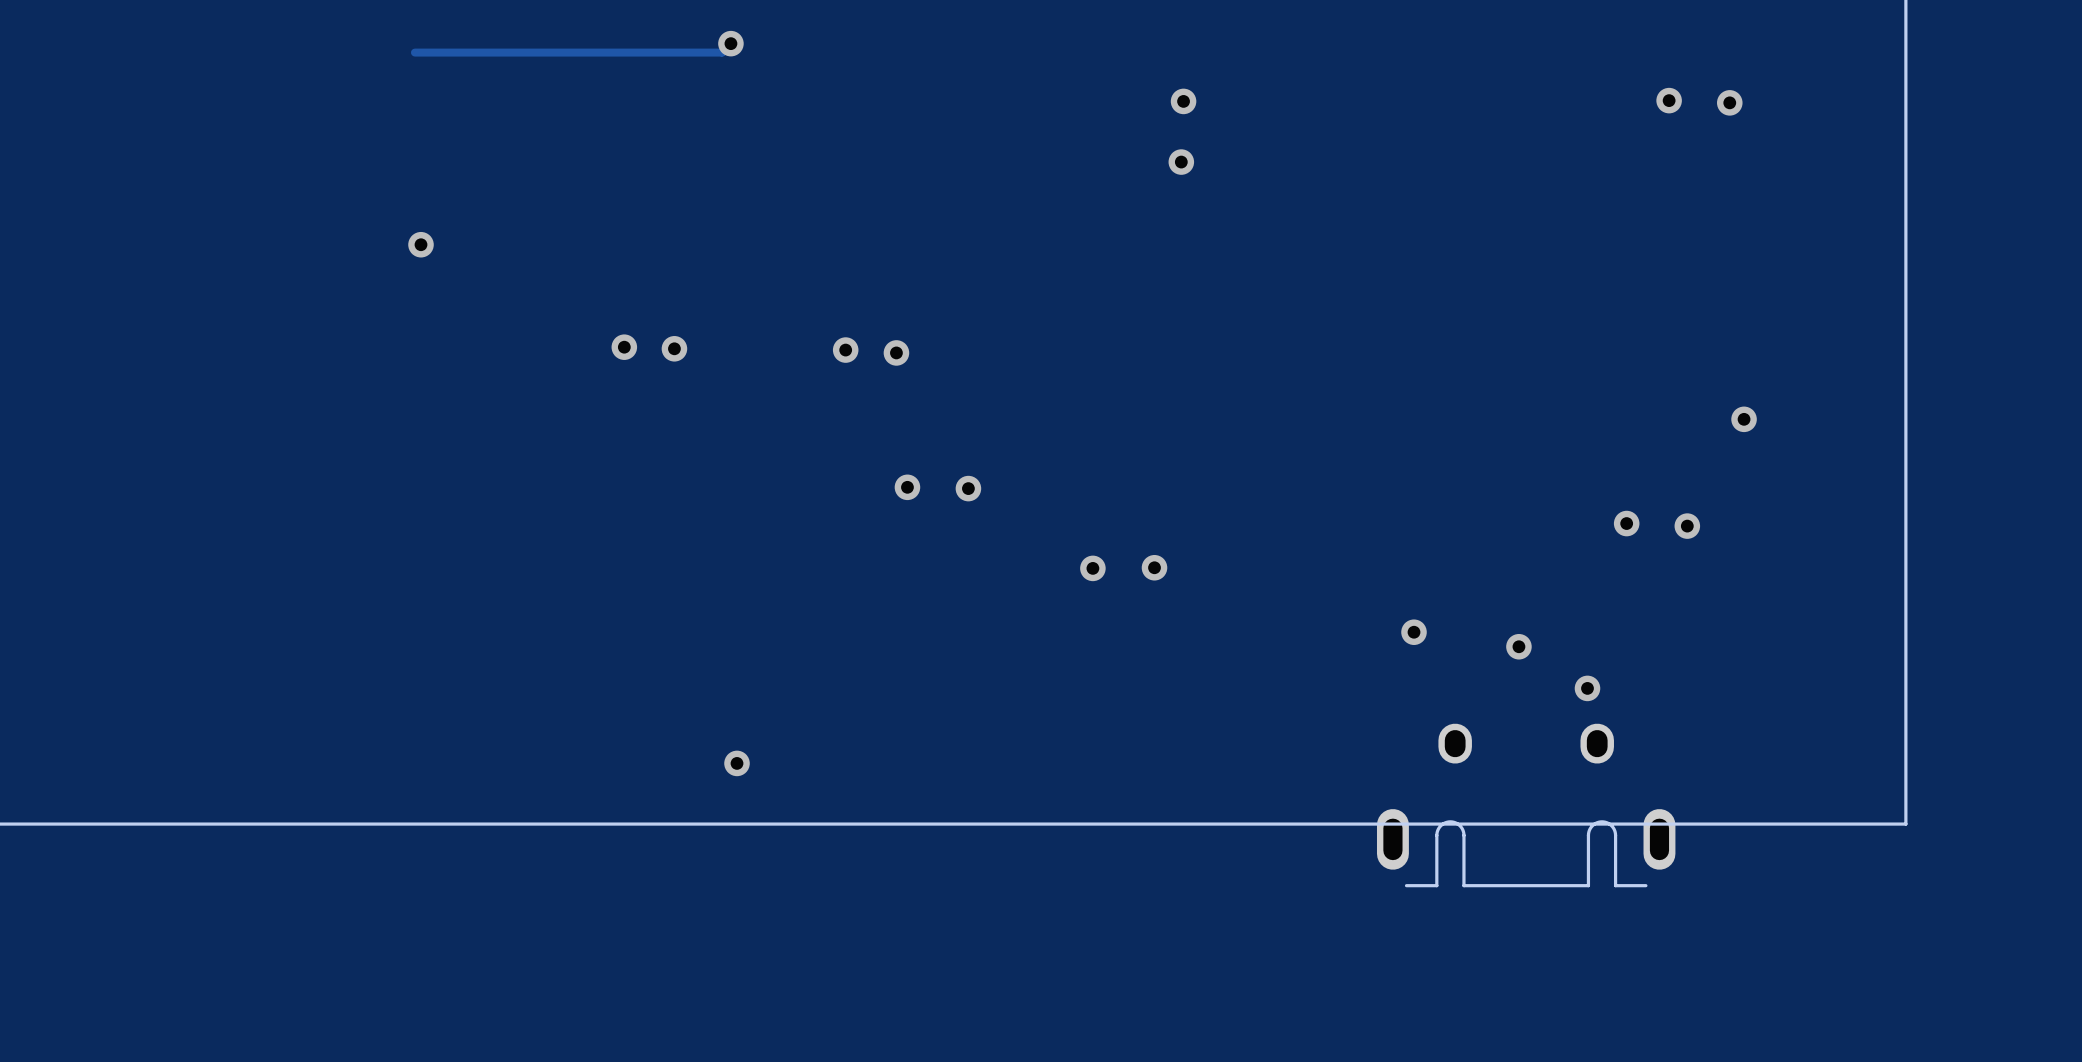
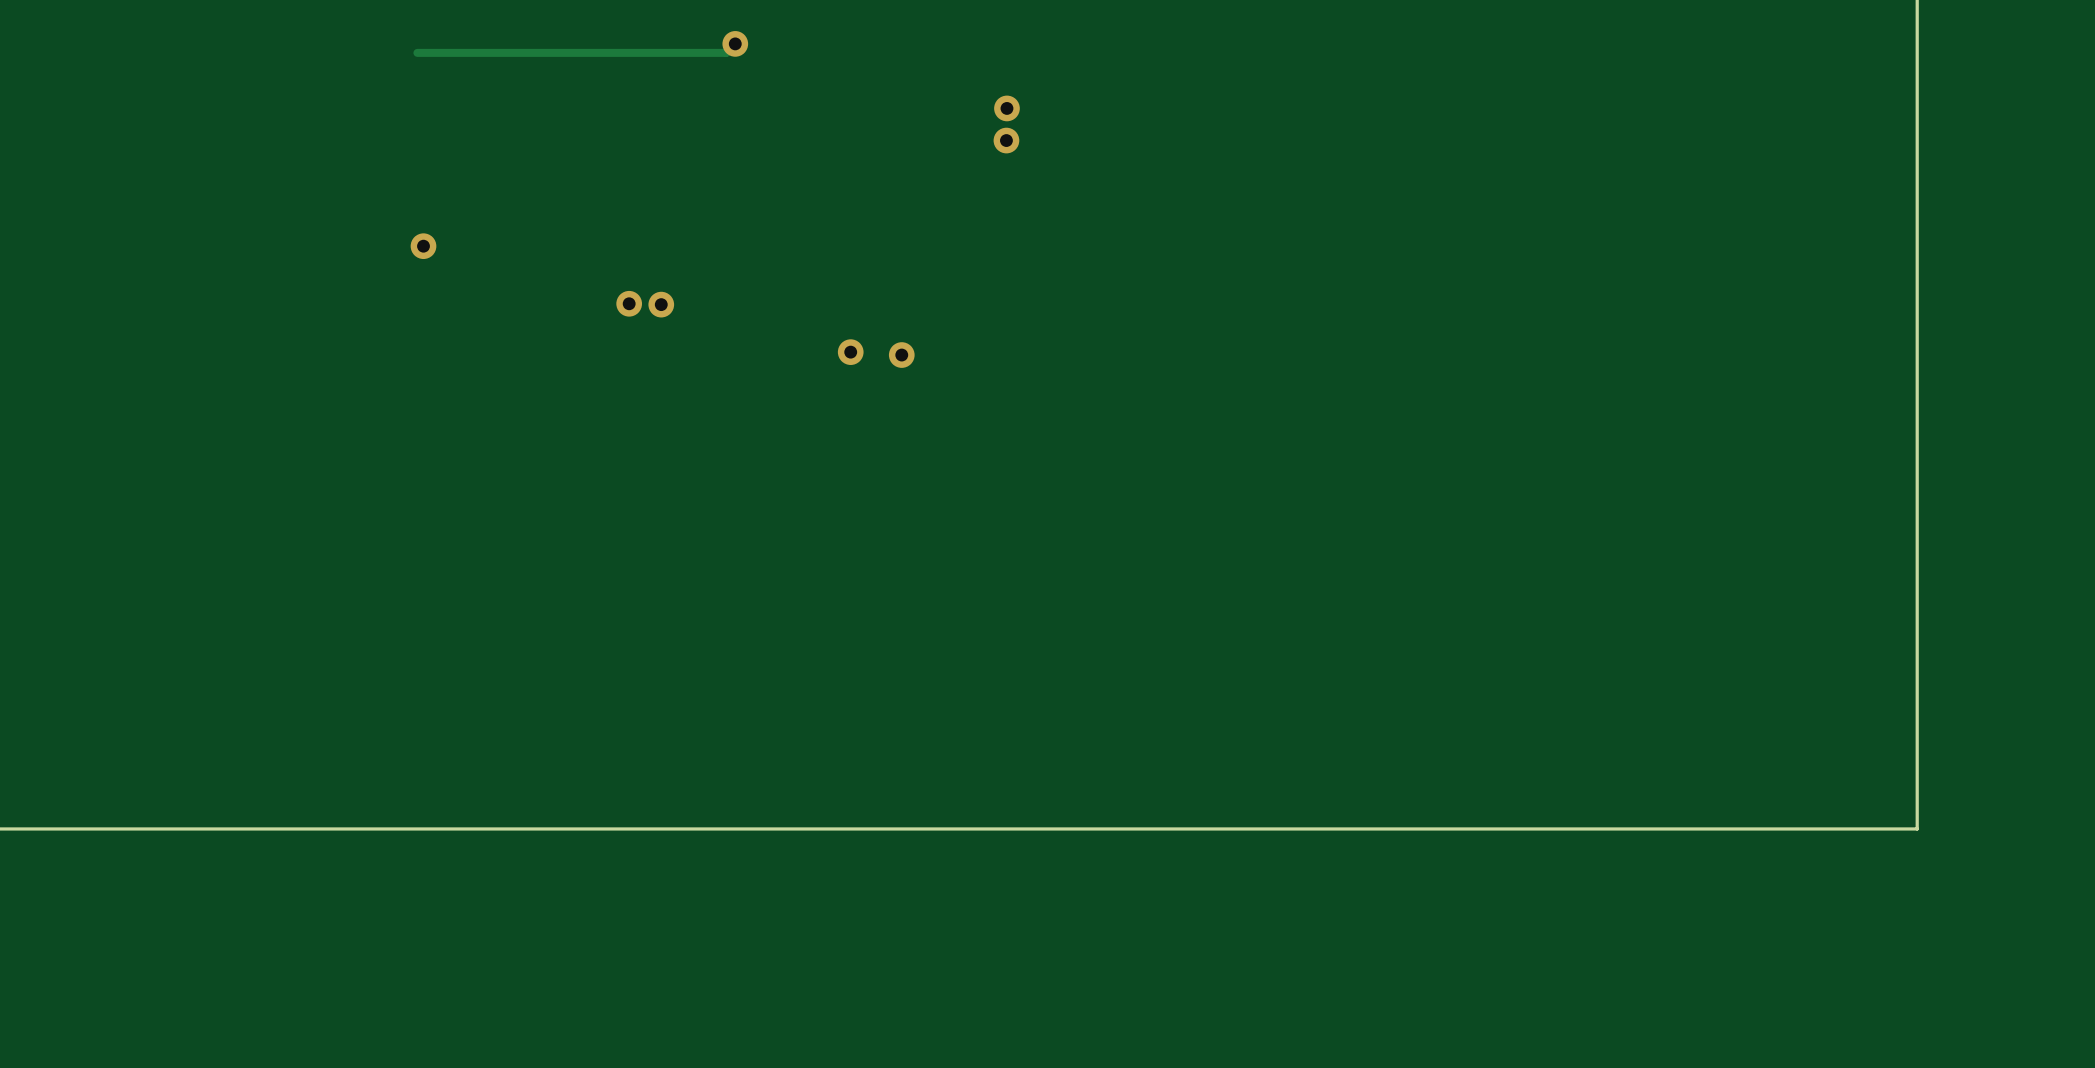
via: (1669, 100) -> none
via: (1183, 101) -> none
via: (1729, 102) -> none
via: none -> (1006, 108)
via: none -> (1006, 140)
via: (1181, 162) -> none
via: none -> (629, 303)
via: none -> (661, 304)
via: (624, 347) -> none
via: (674, 348) -> none
via: (1744, 419) -> none
via: (907, 487) -> none
via: (968, 488) -> none
via: (1626, 523) -> none
via: (1687, 526) -> none
via: (1154, 567) -> none
via: (1092, 568) -> none
via: (1414, 632) -> none
via: (1518, 646) -> none
via: (1587, 688) -> none
via: (737, 763) -> none
part: (1526, 805) -> none

